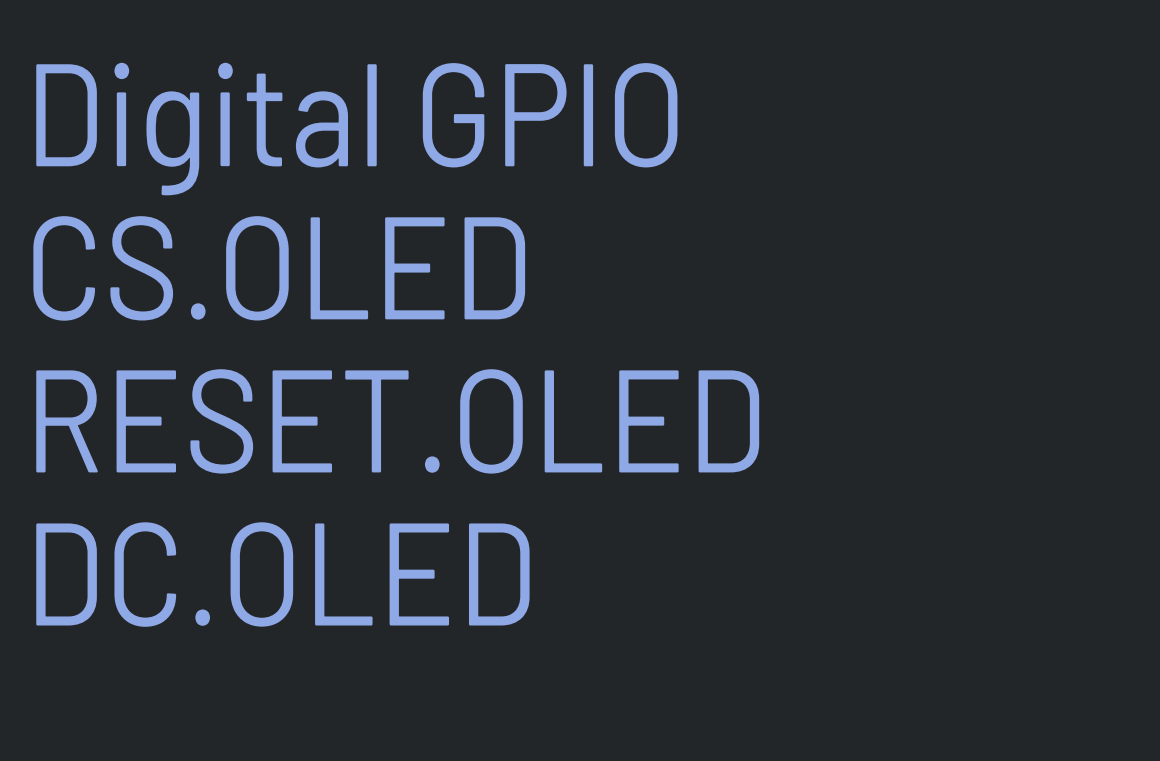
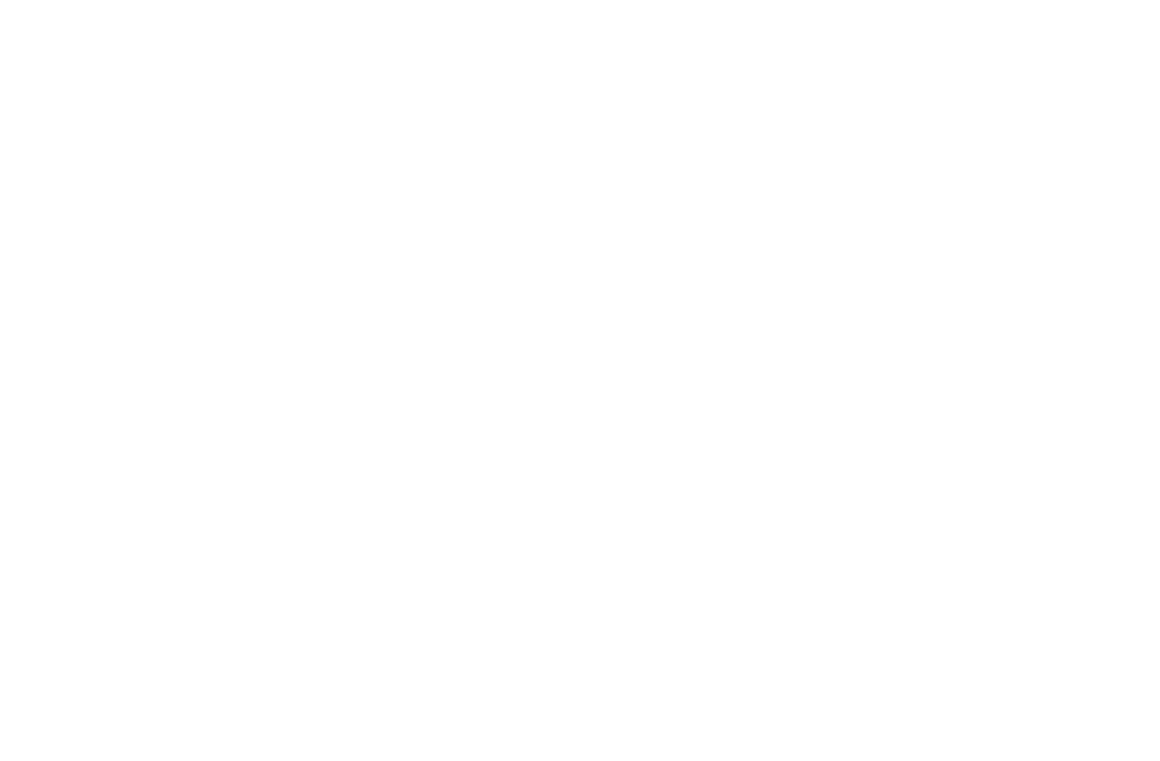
text: Digital GPIO (356, 129) -> none
text: CS.OLED (279, 268) -> none
text: RESET.OLED (397, 421) -> none
text: DC.OLED (282, 574) -> none

